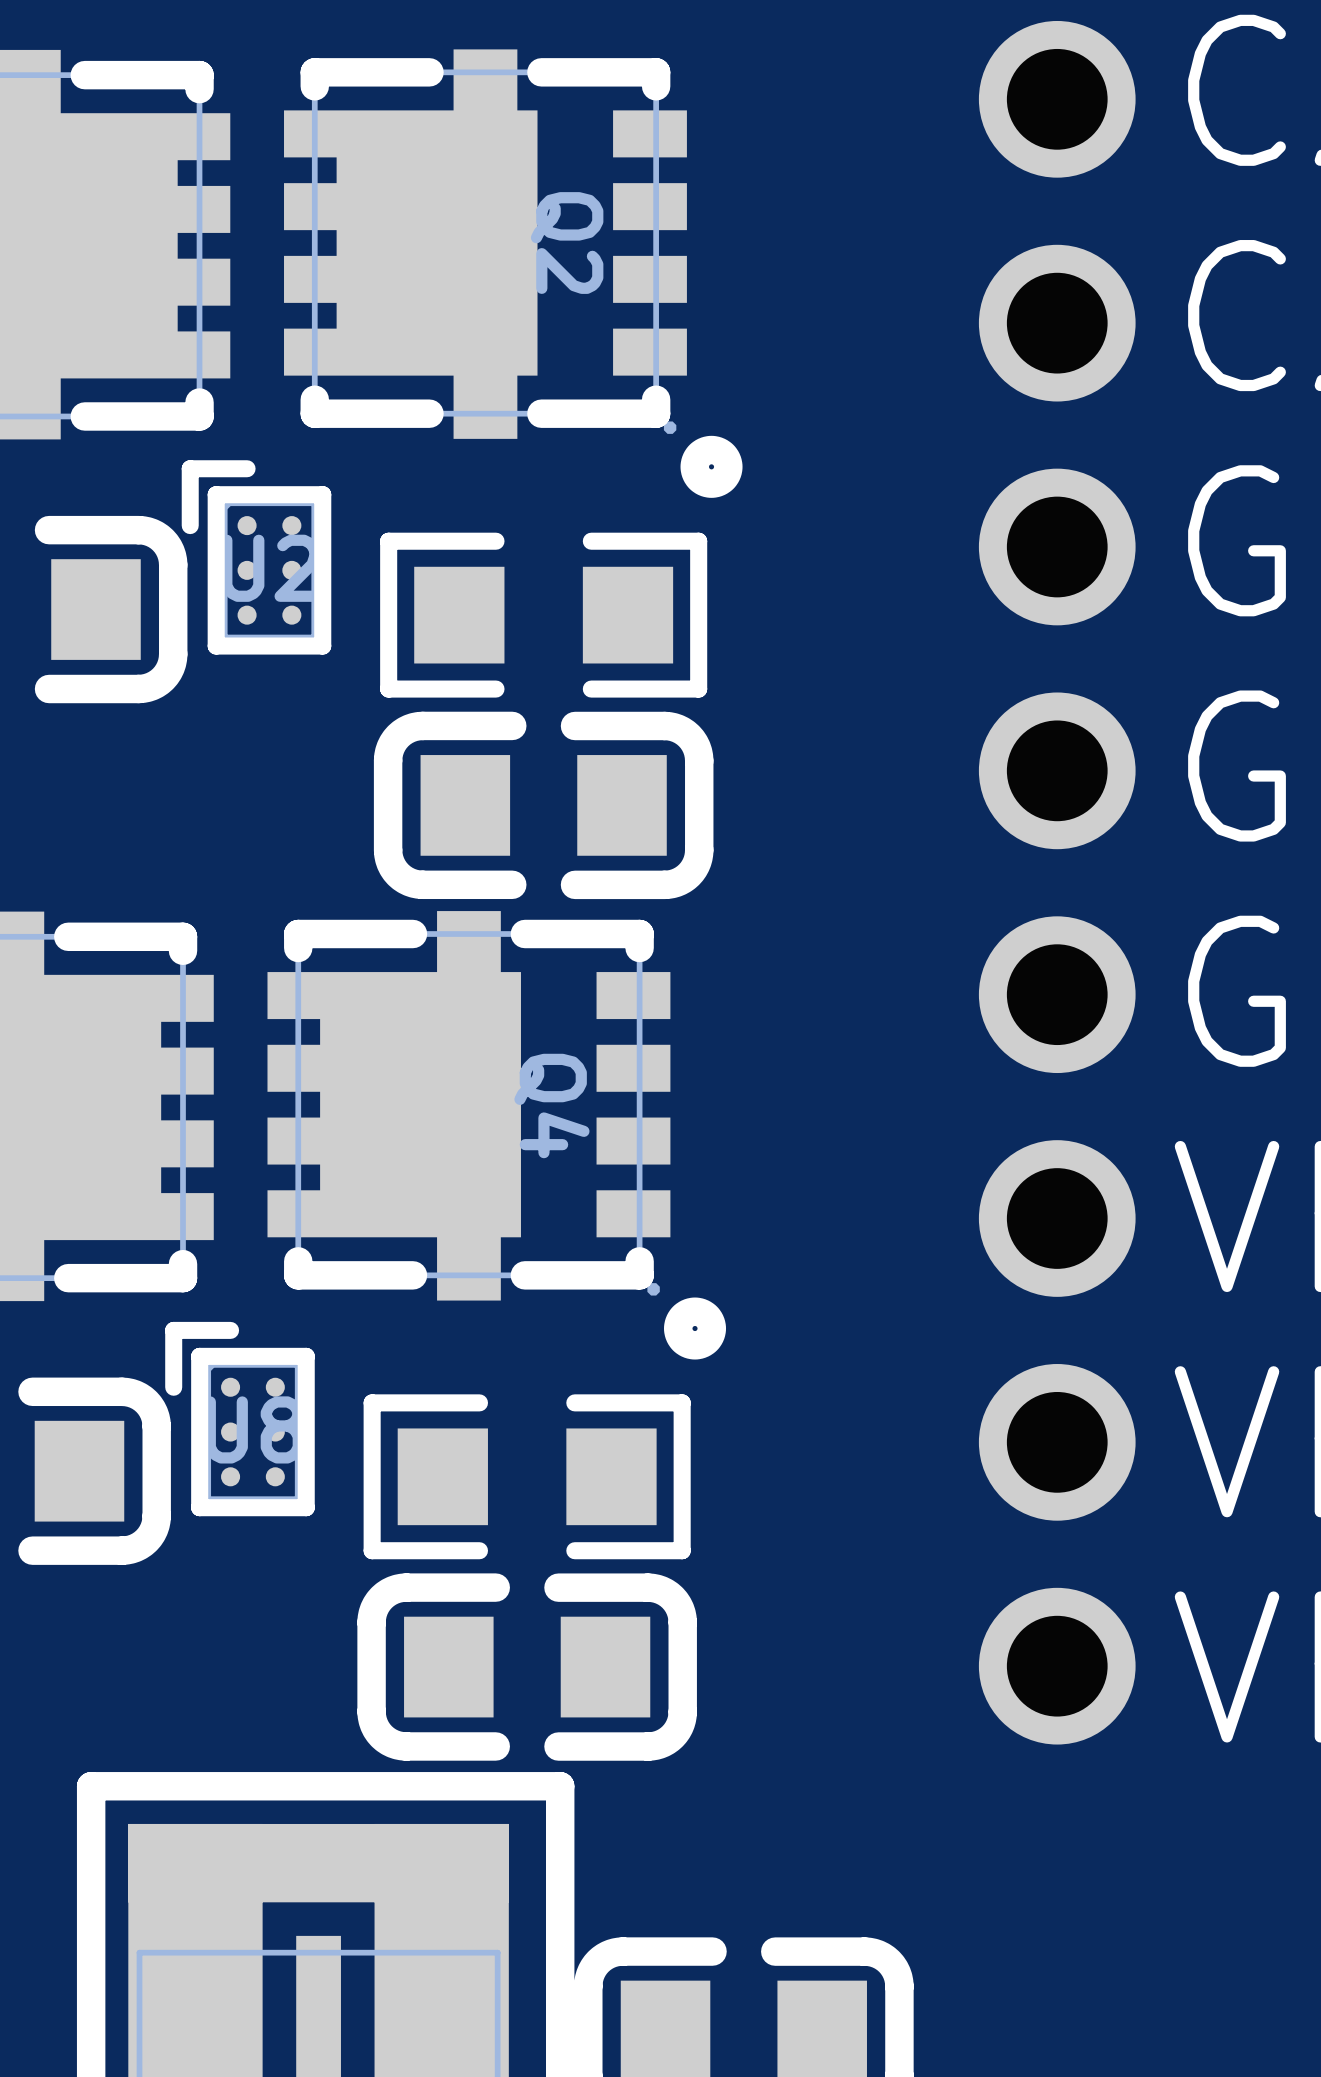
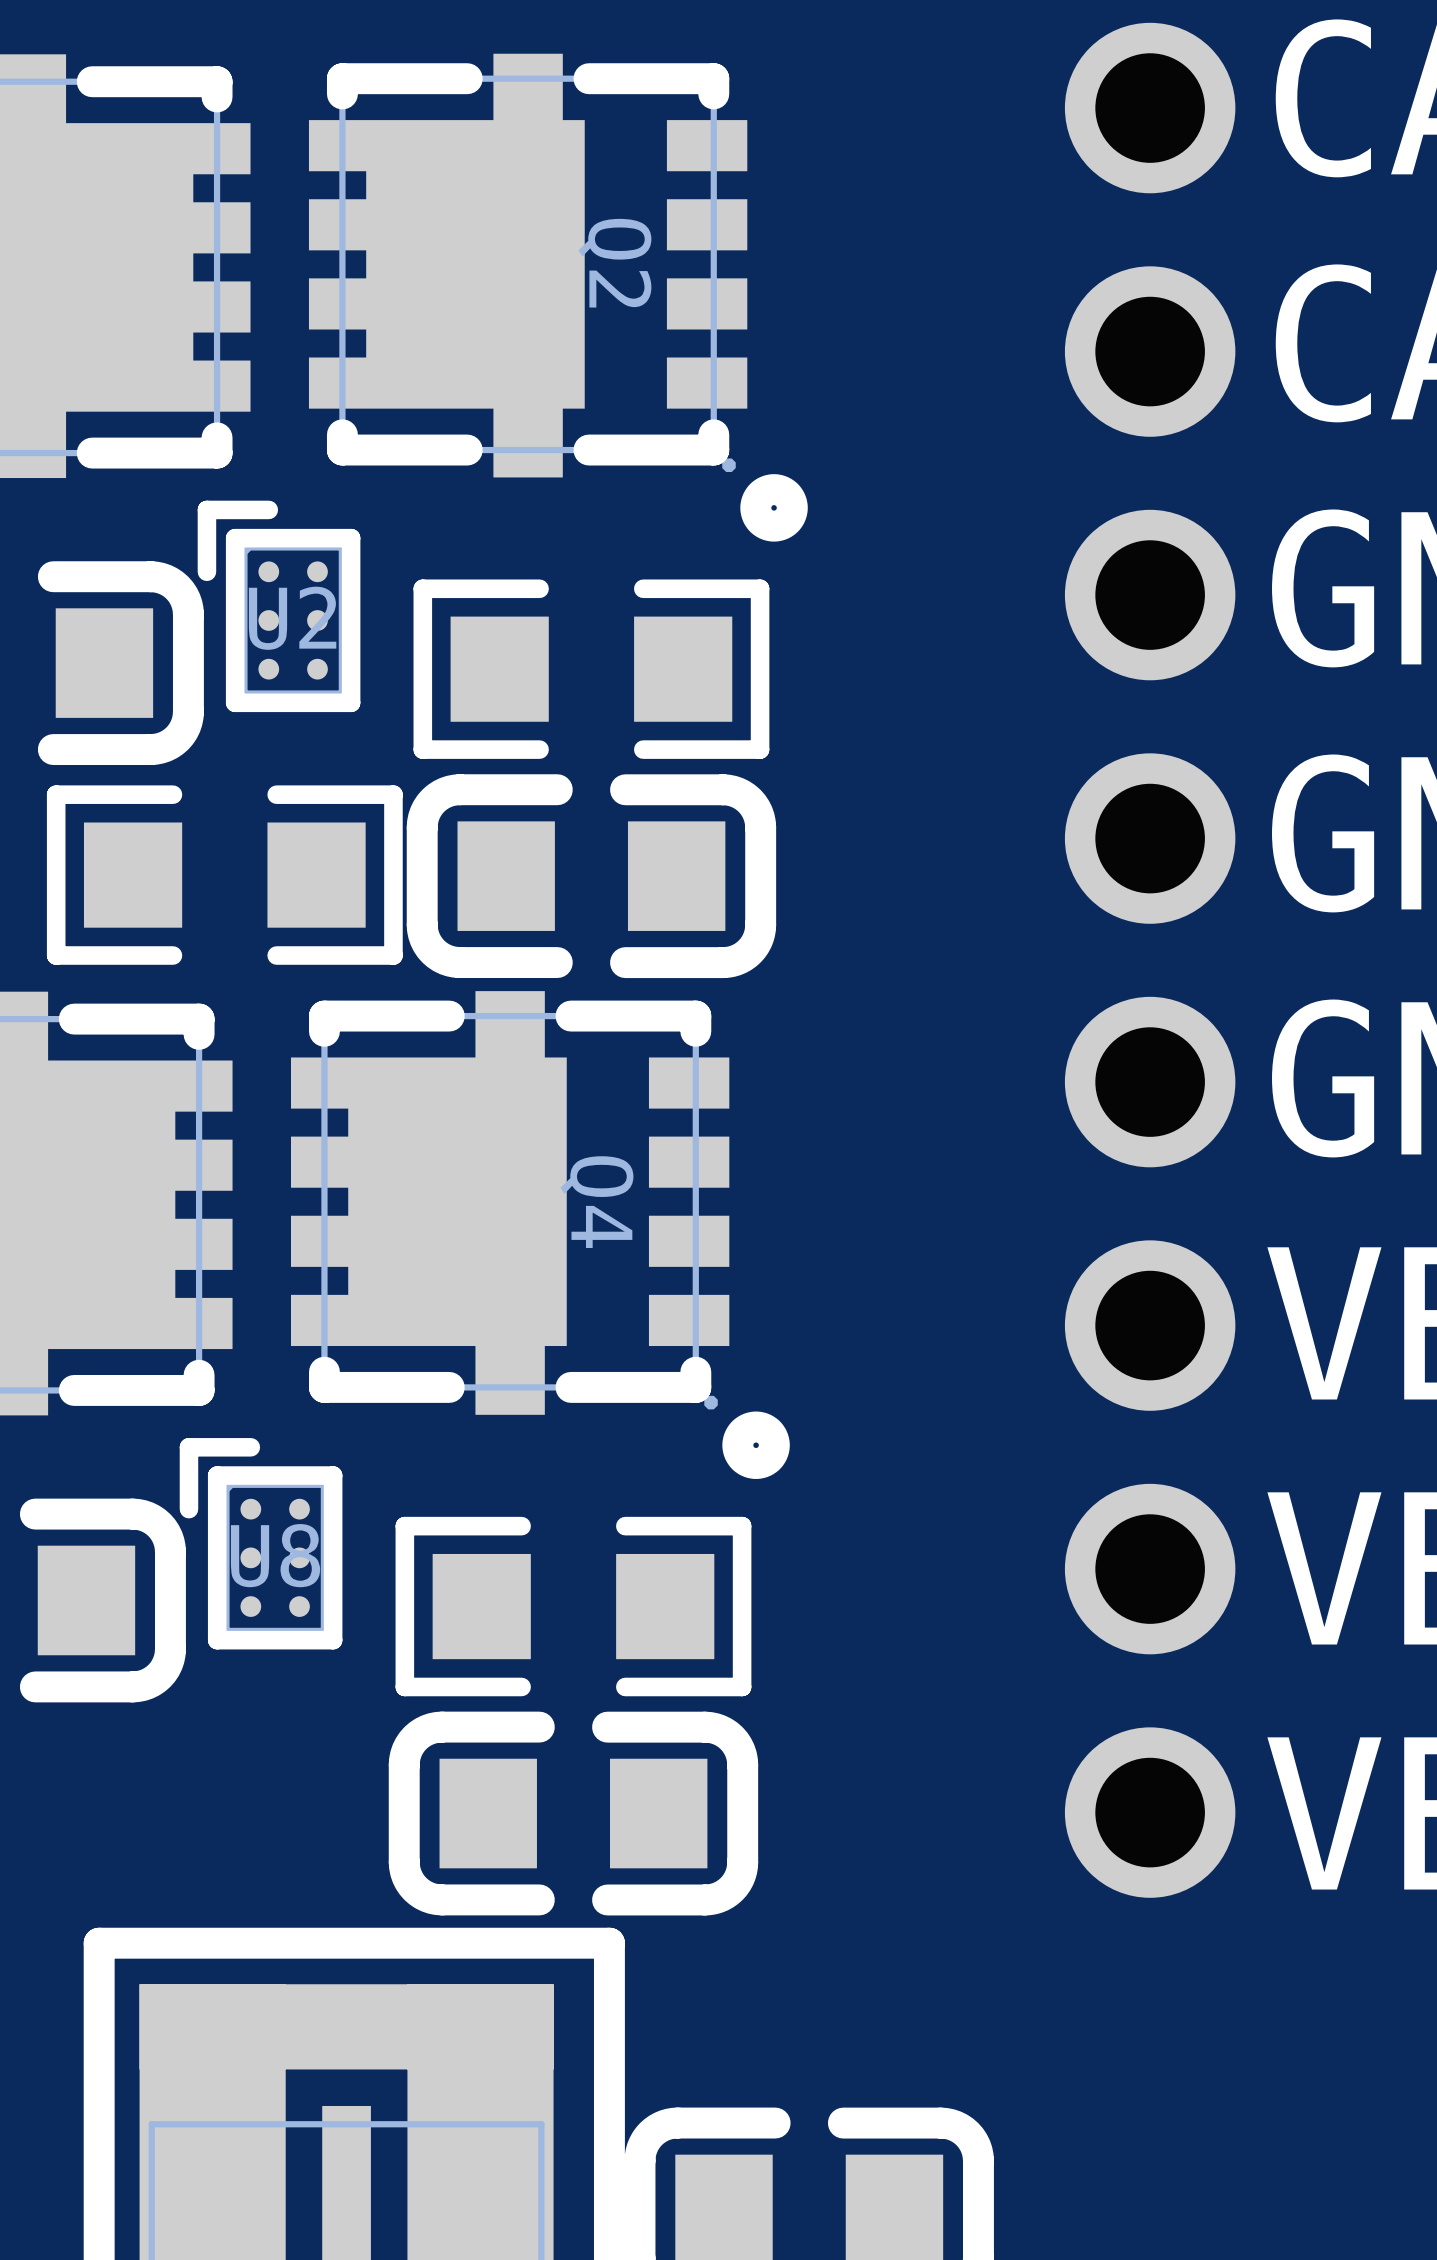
part: none -> (224, 875)

